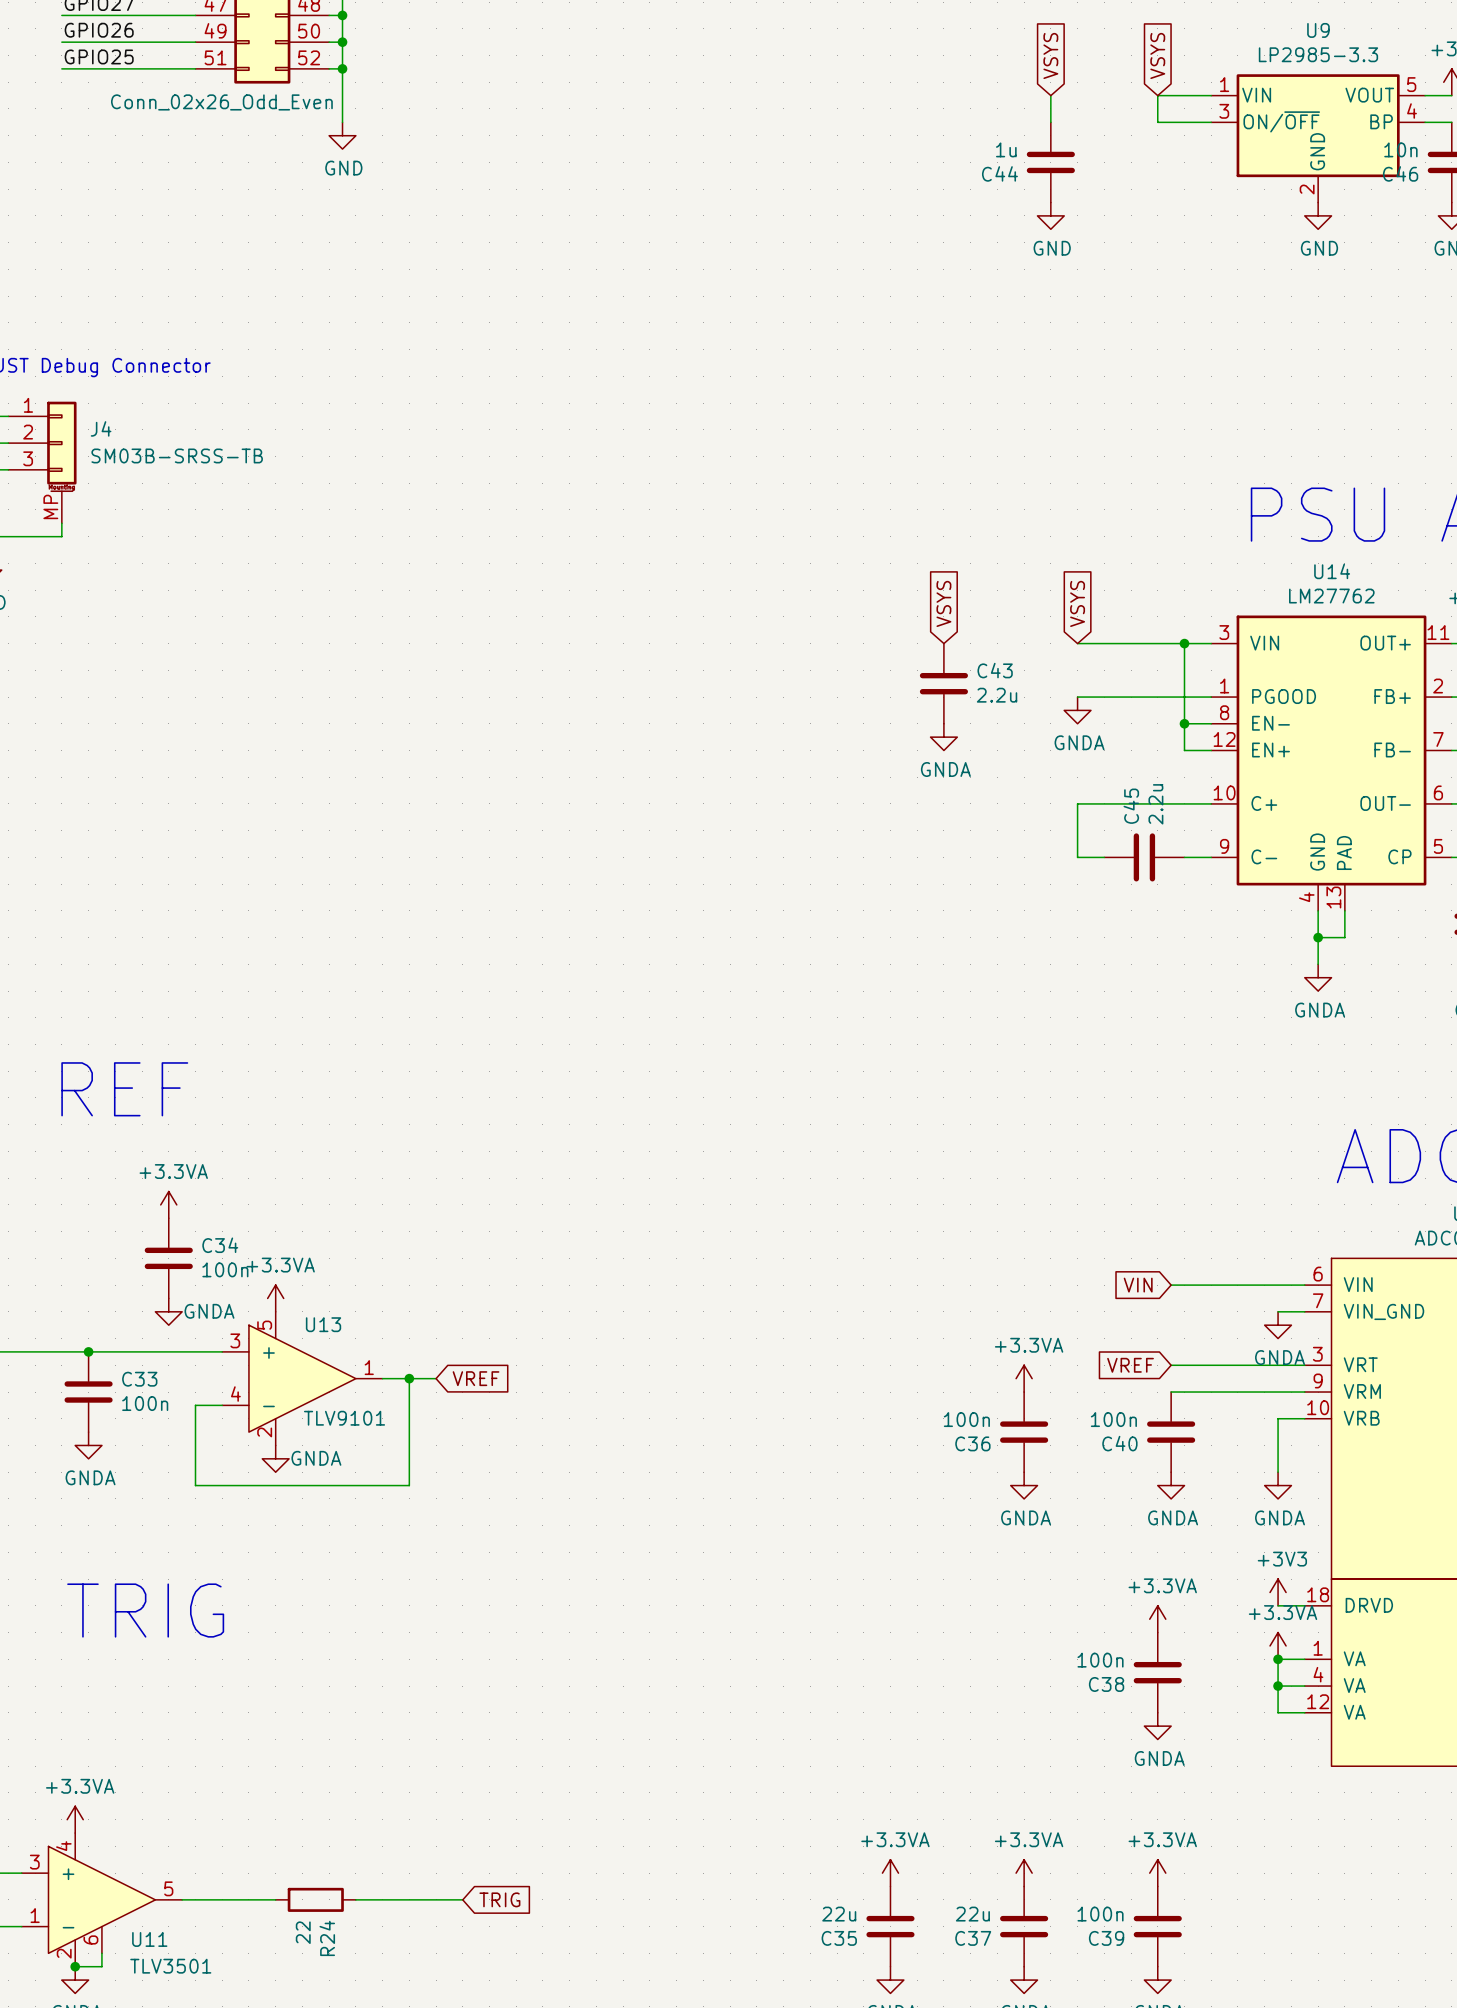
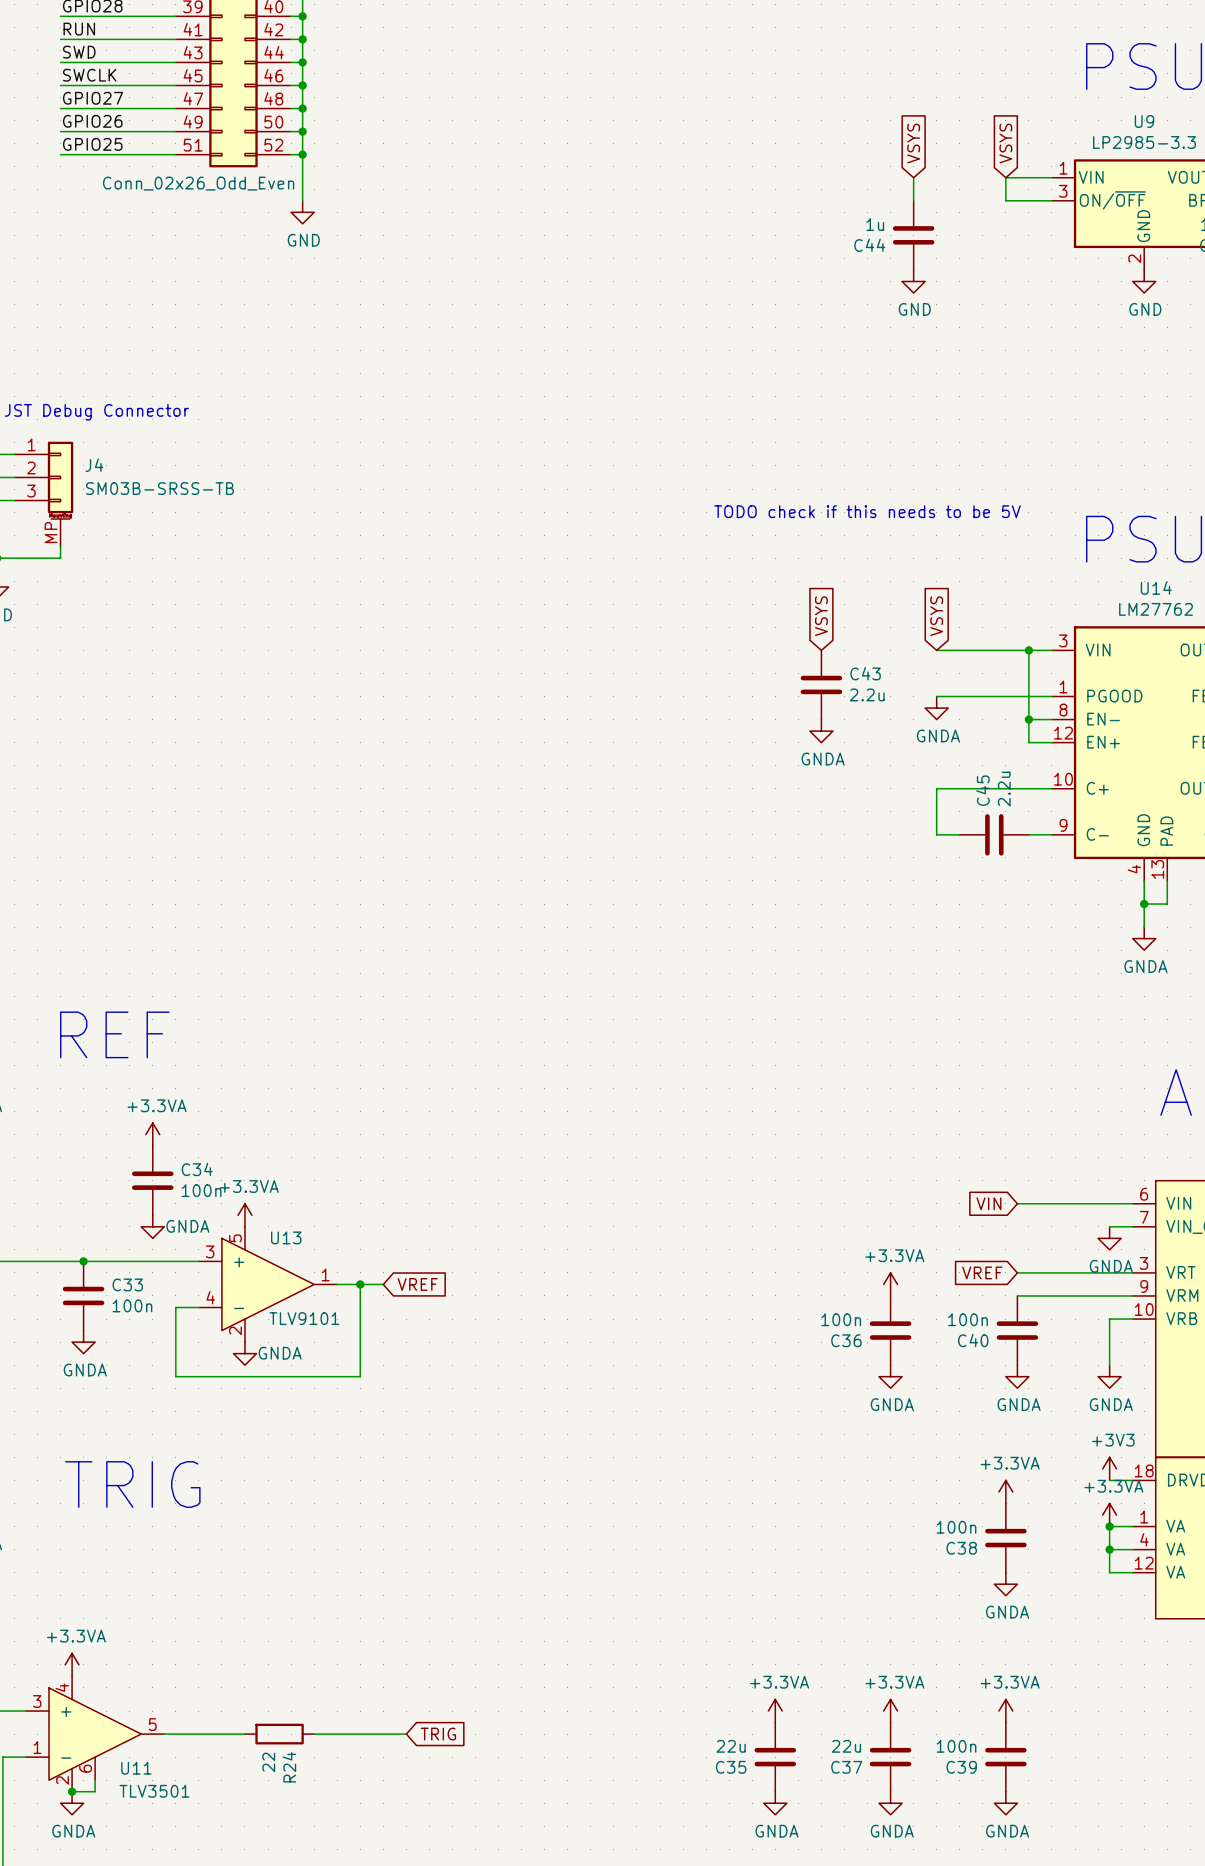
text: none -> TODO check if this needs to be 5V (867, 511)

